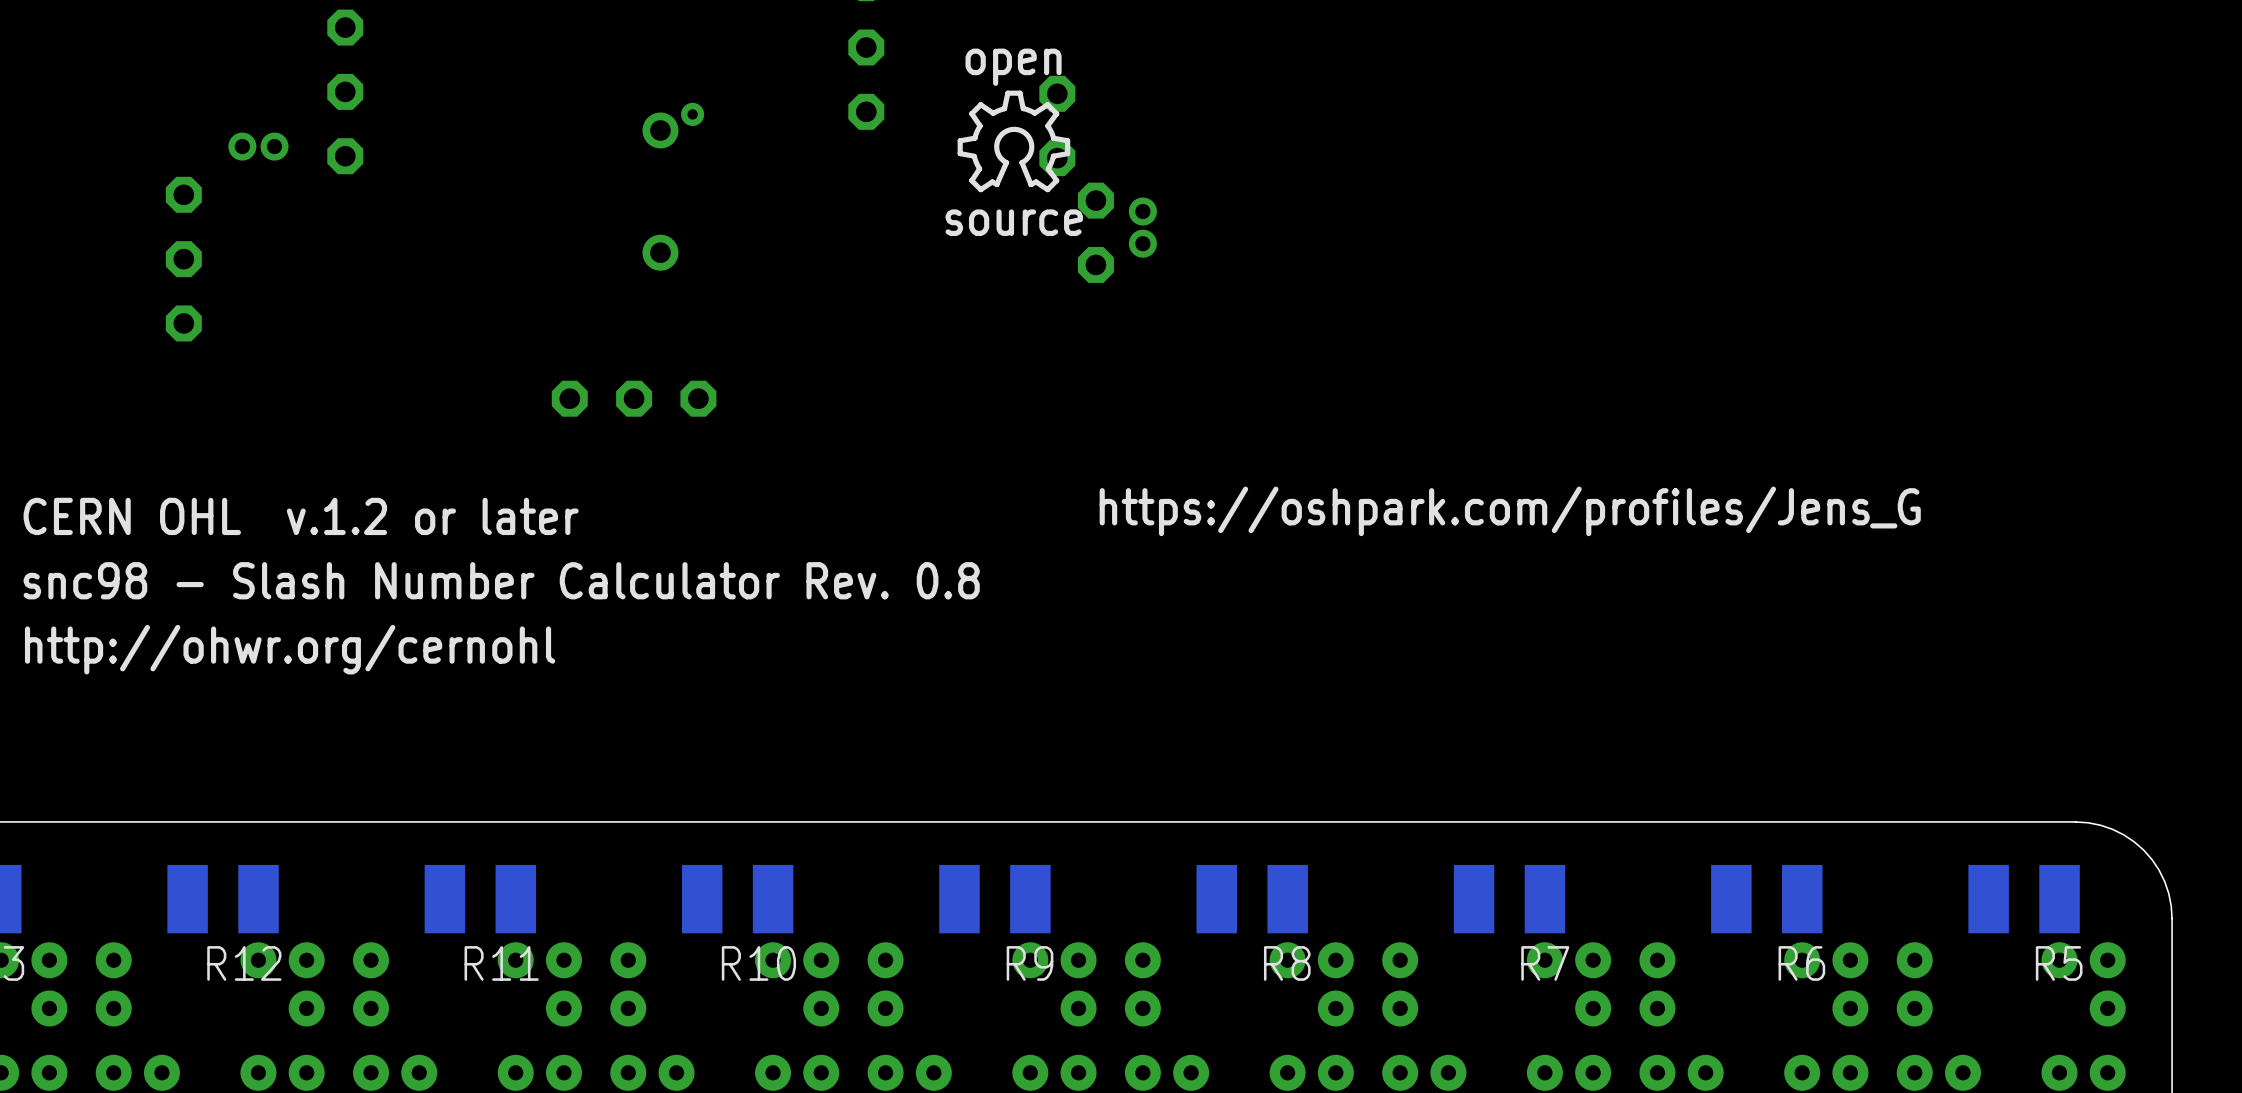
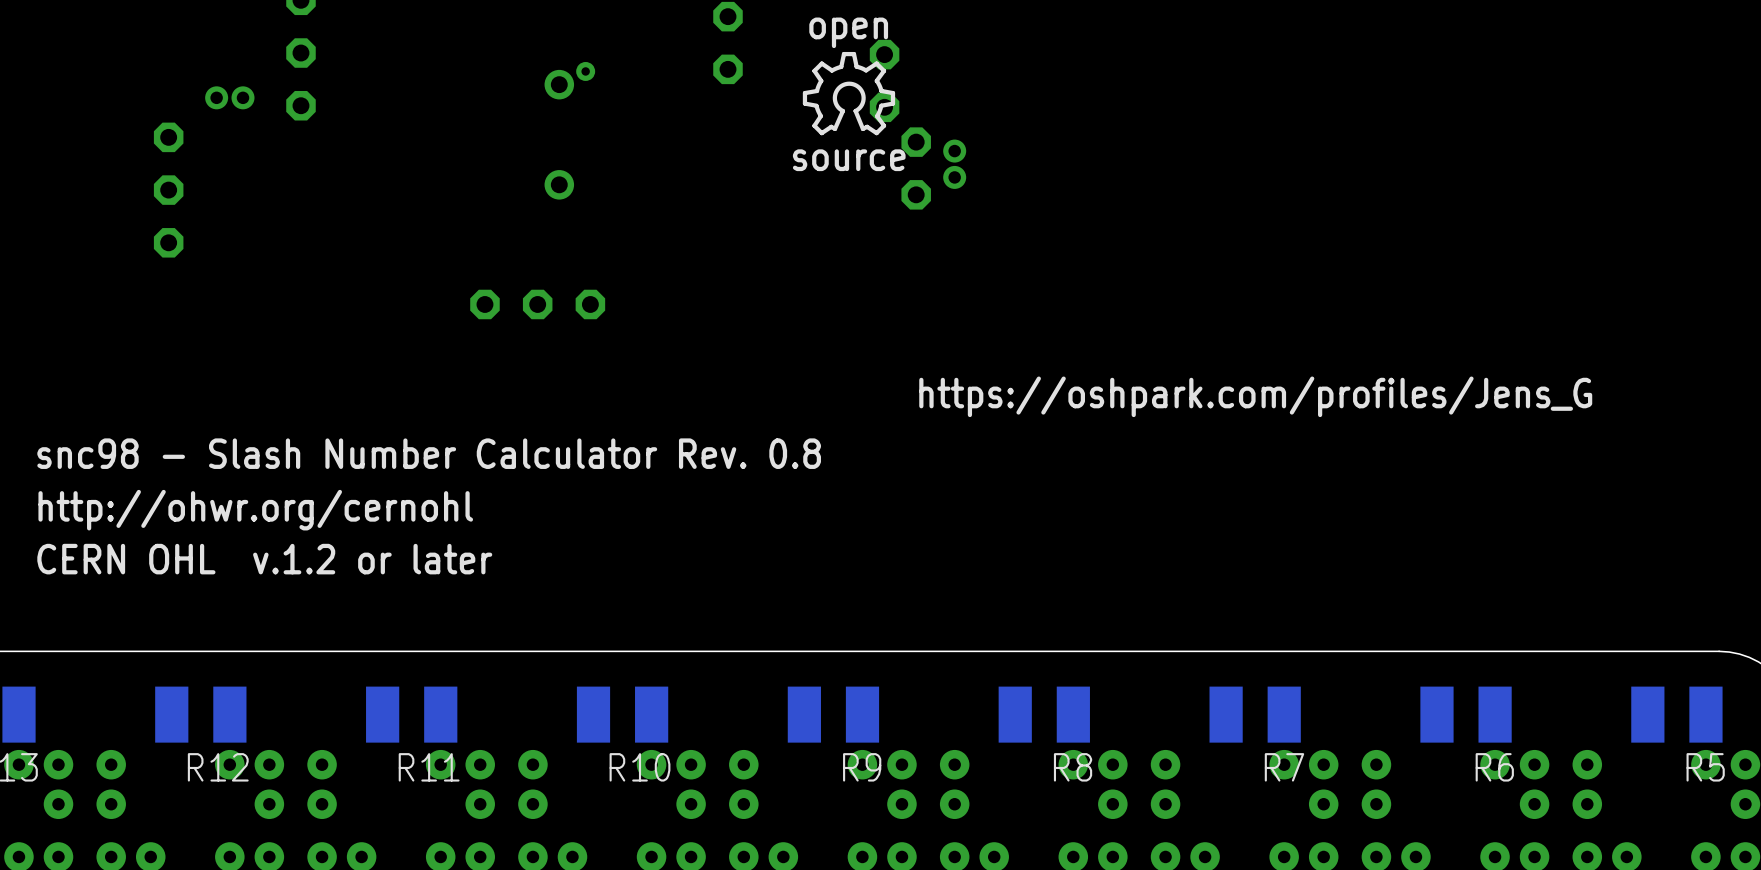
text position: CERN OHL v.1.2 or later (301, 516) -> CERN OHL v.1.2 or later (264, 559)

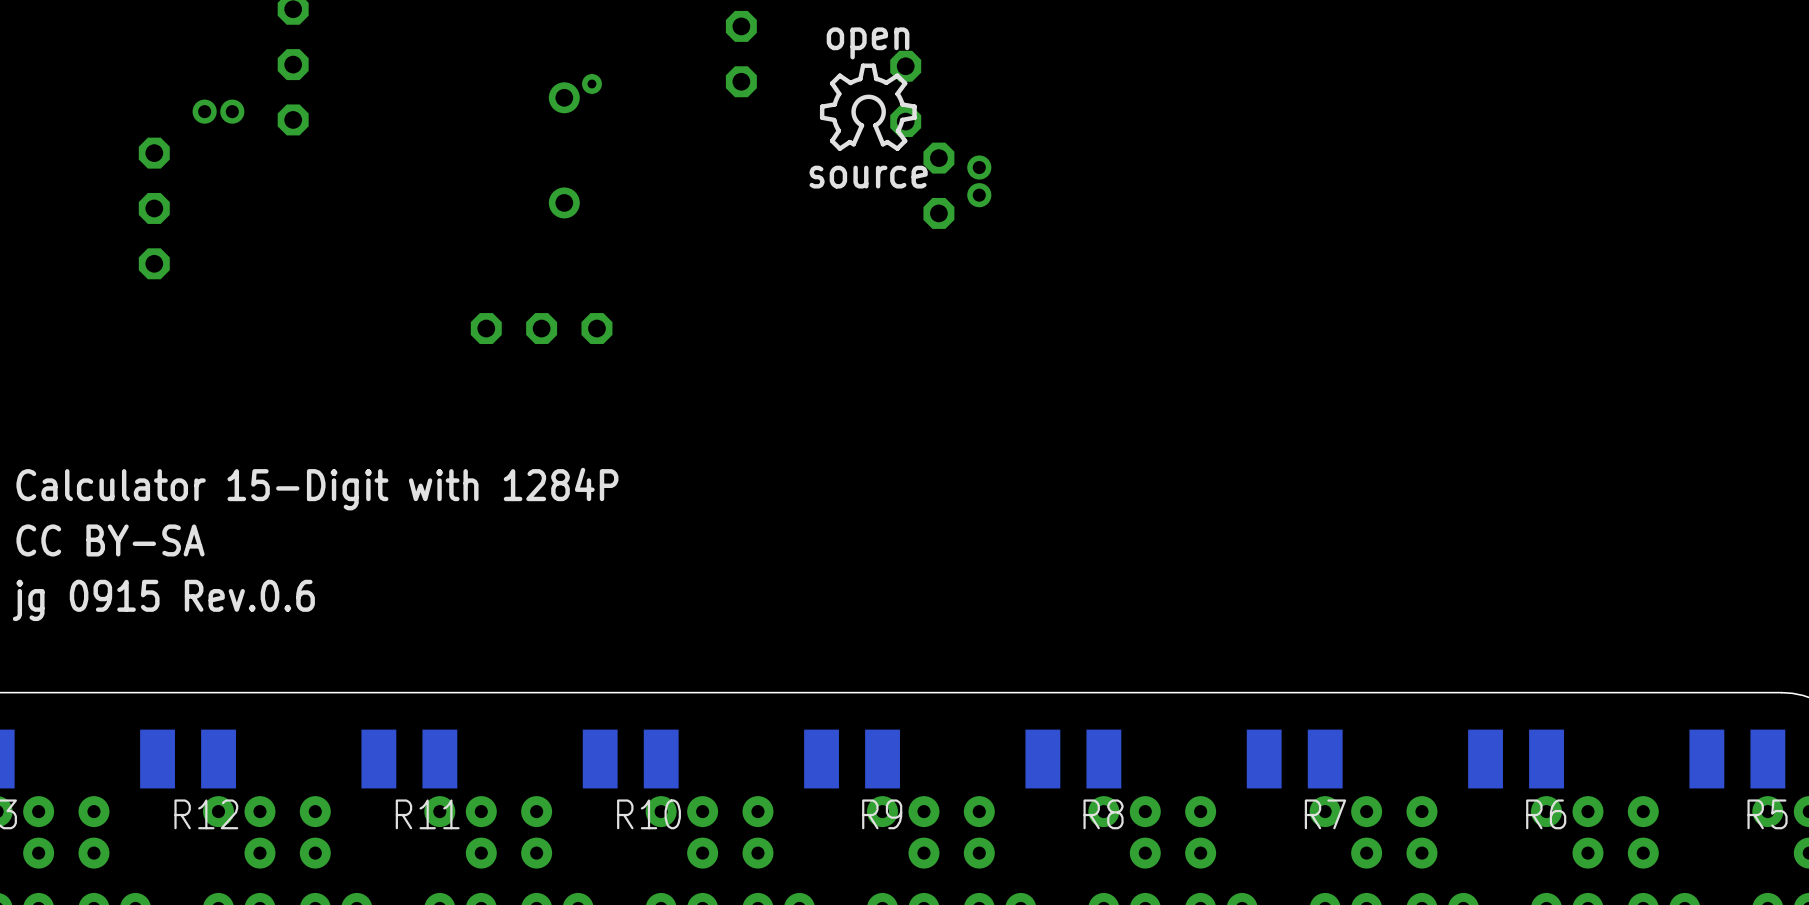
text: https://oshpark.com/profiles/Jens_G (1255, 396) -> none
text: snc98 - Slash Number Calculator Rev. 0.8 (429, 453) -> Calculator 15-Digit with 1284P (317, 489)
text: http://ohwr.org/cernohl (255, 510) -> CC BY-SA (110, 540)
text: CERN OHL v.1.2 or later (264, 559) -> jg 0915 Rev.0.6 (163, 600)

